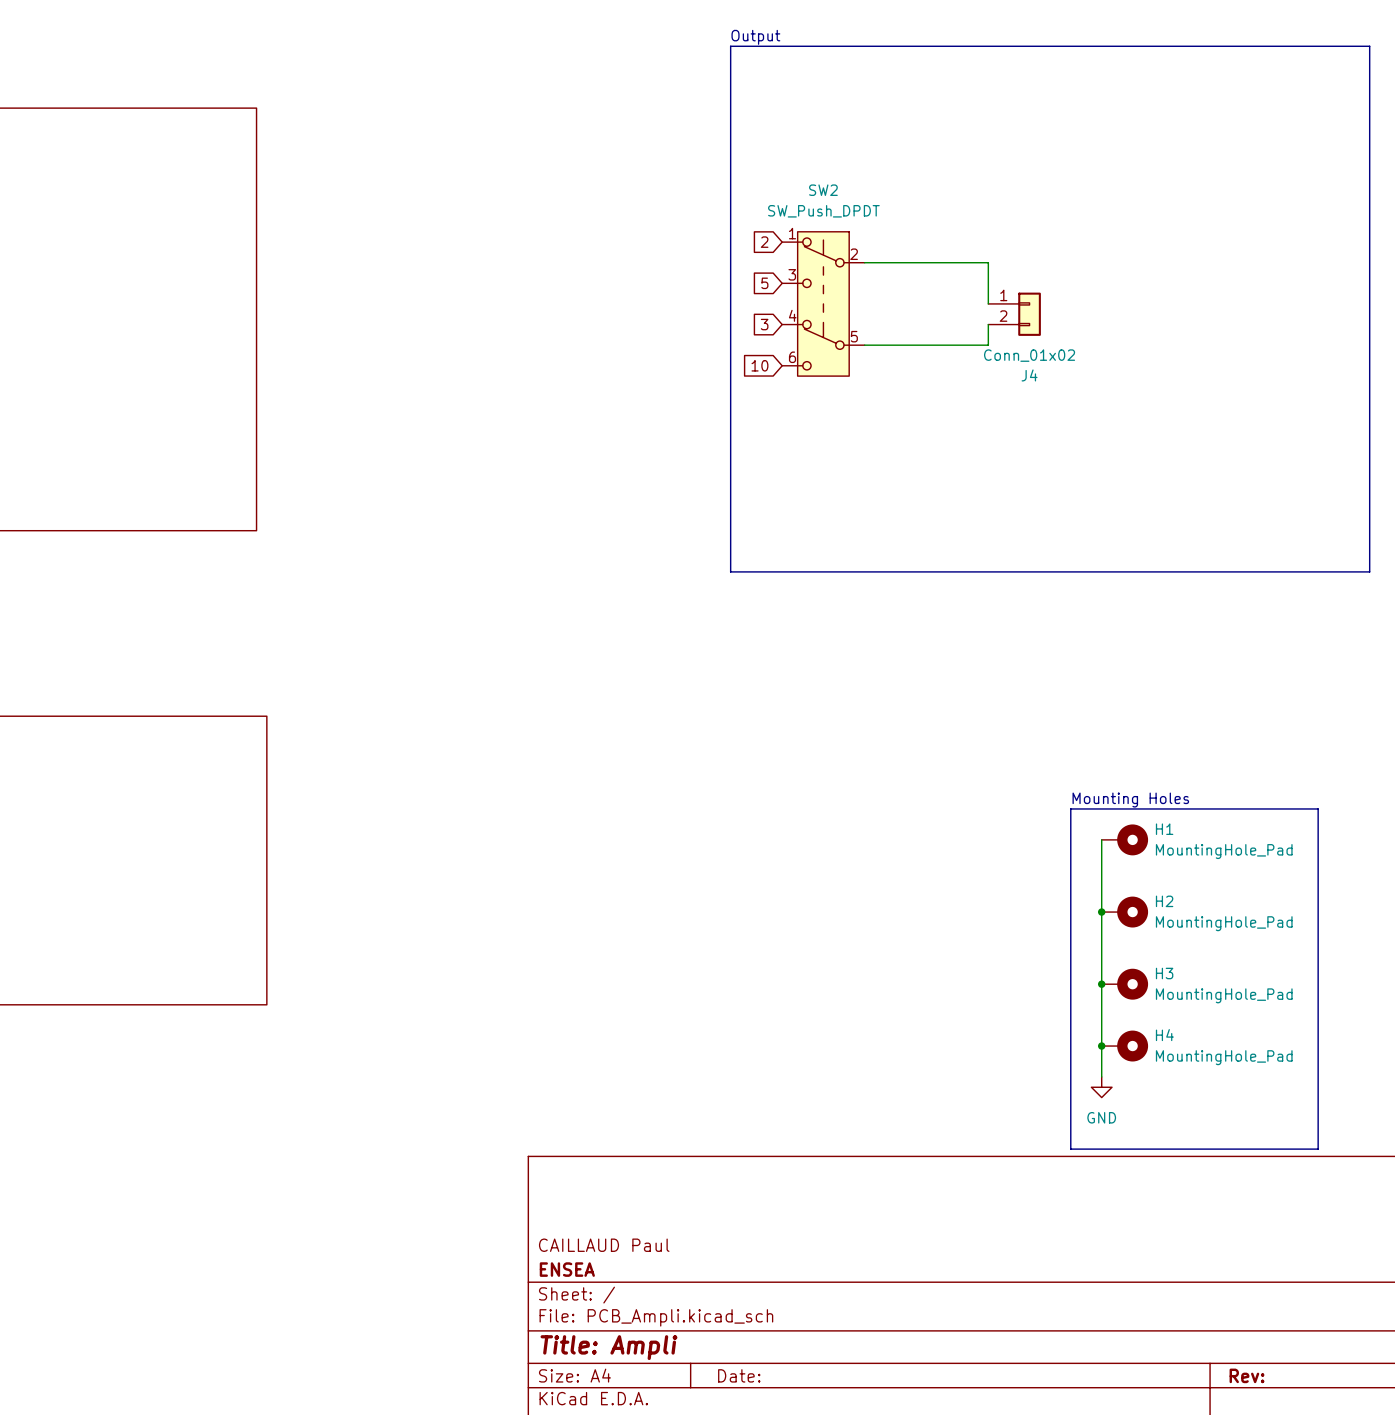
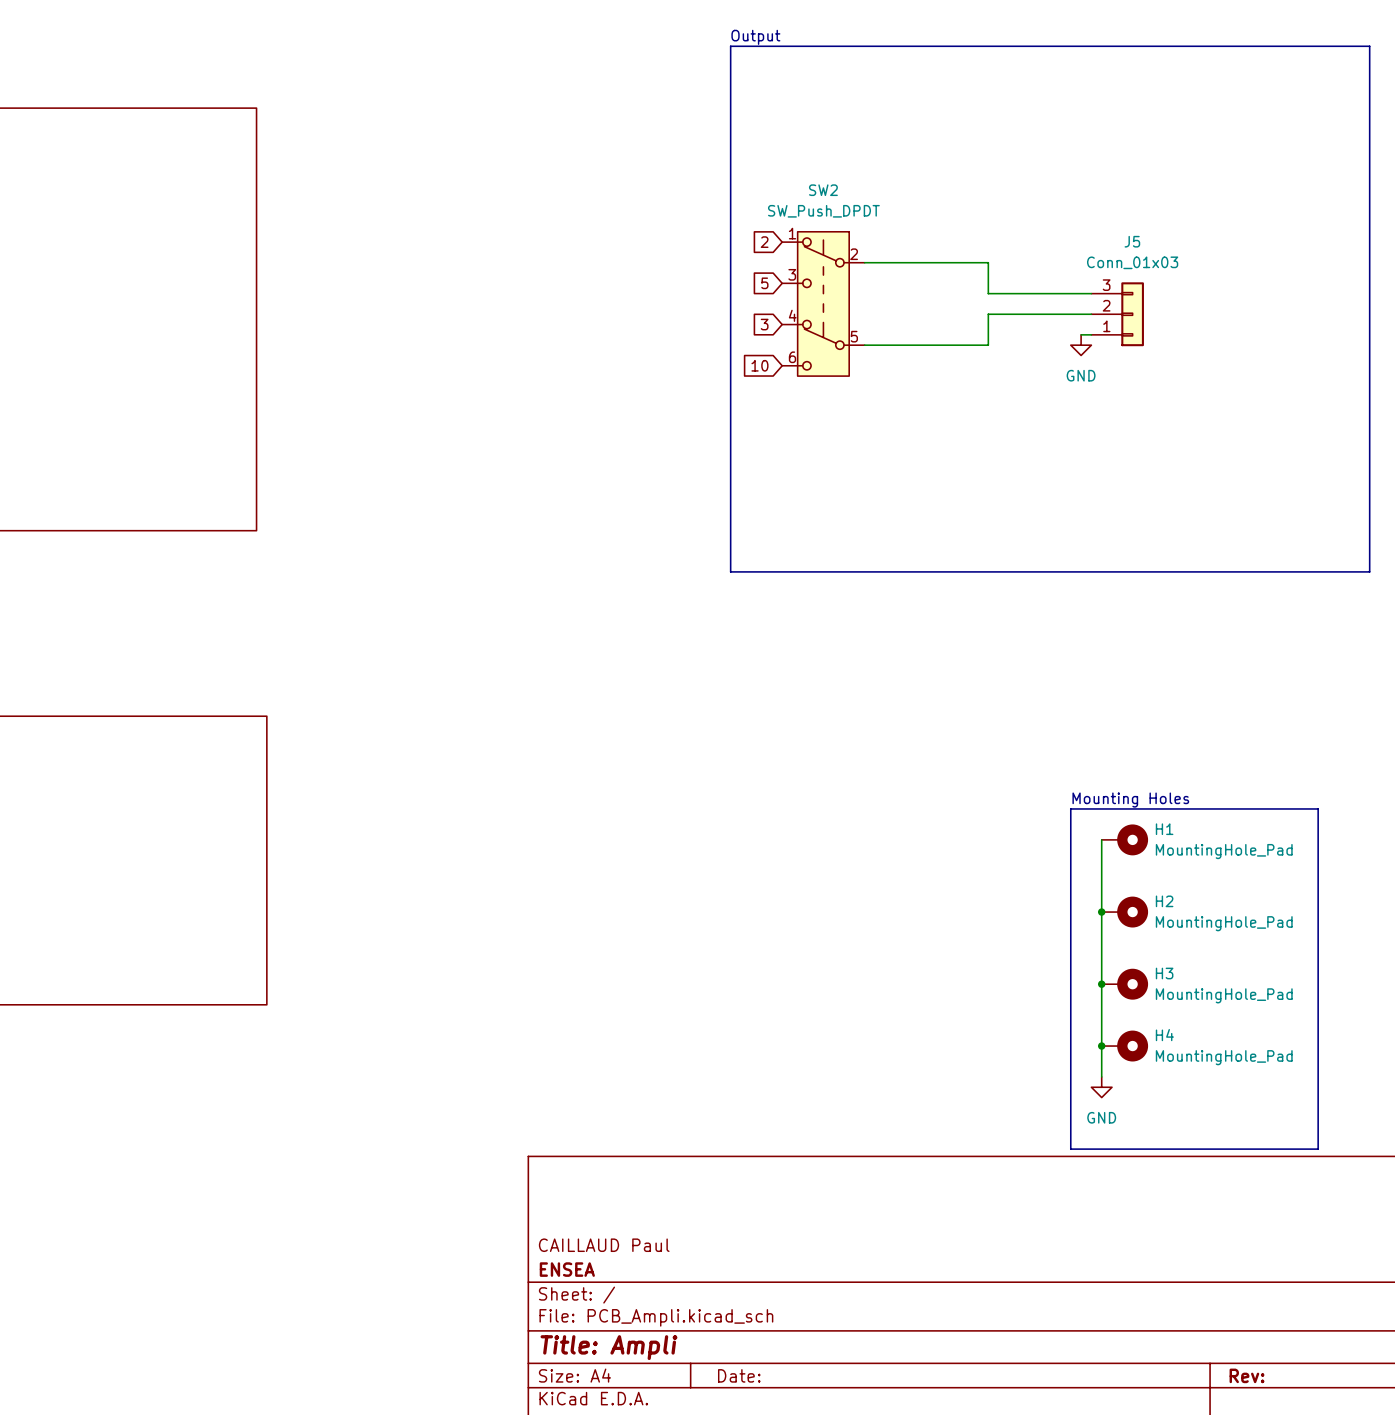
wire: (988, 293) (988, 303) -> (988, 293) (1091, 293)
J4: Conn_01x02 (1014, 314) -> none
wire: none -> (1091, 314) (988, 314) (988, 324)
J5: none -> Conn_01x03 (1117, 314)
wire: none -> (1081, 334) (1091, 334)
power symbol: none -> GND (1081, 345)

